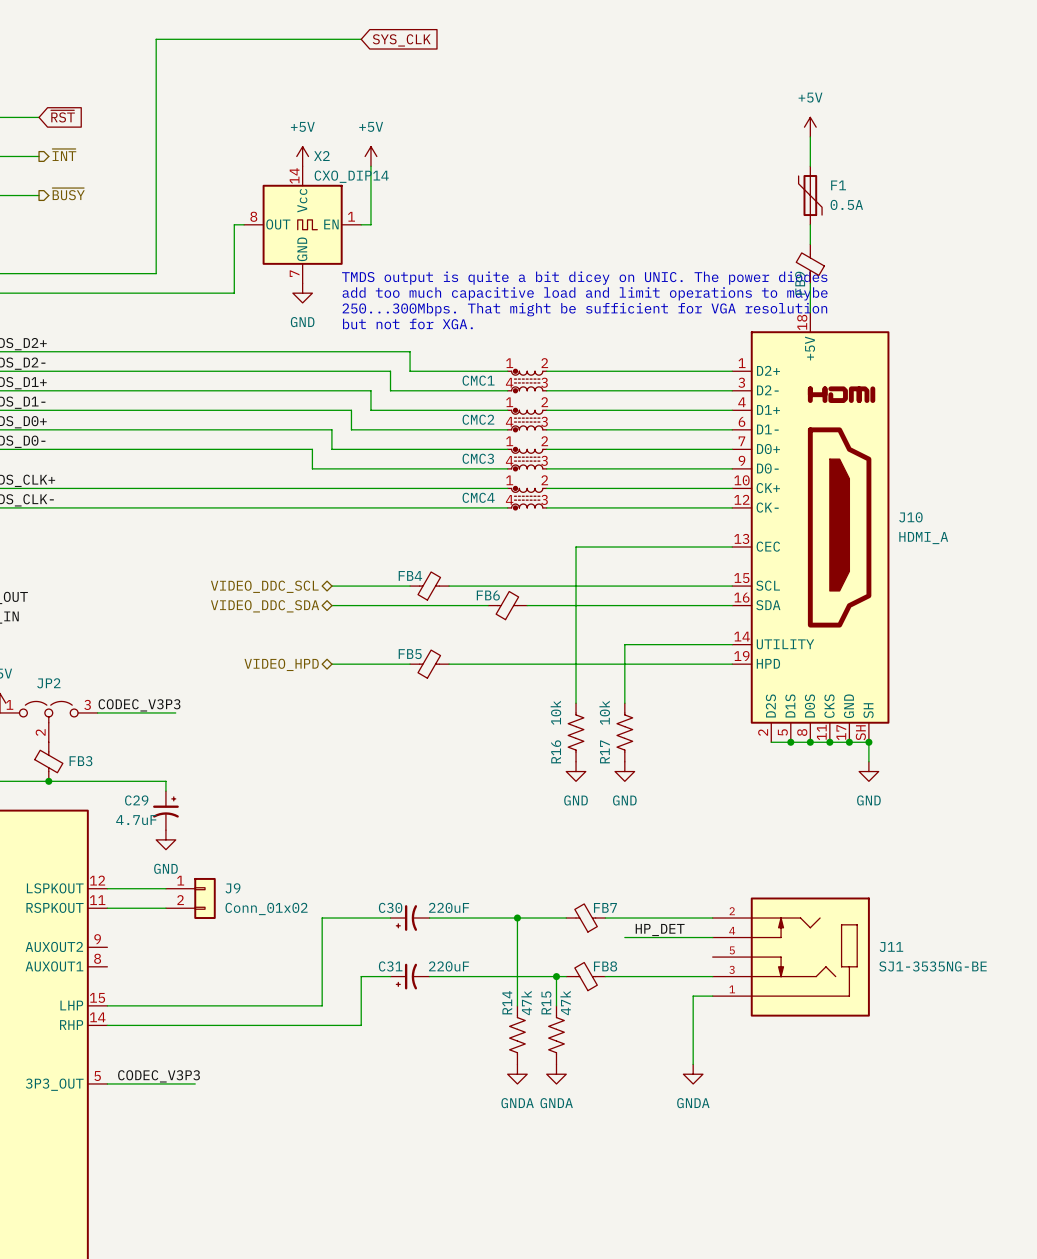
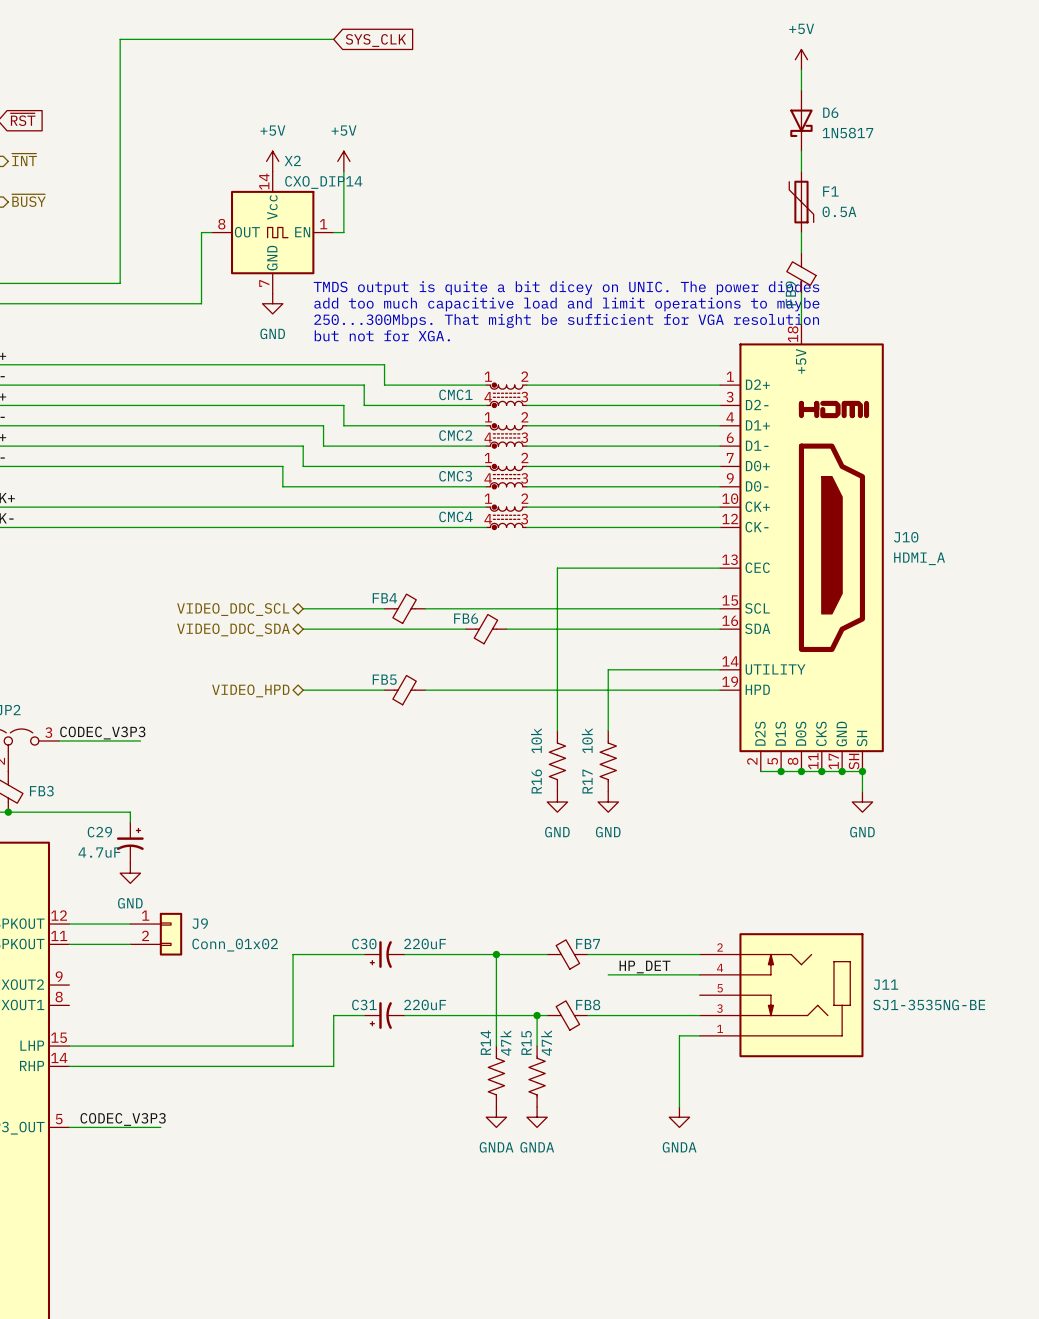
wire: none -> (801, 69) (801, 90)
D6: none -> 1N5817 (801, 120)
power symbol position: +5V (810, 127) -> +5V (801, 59)

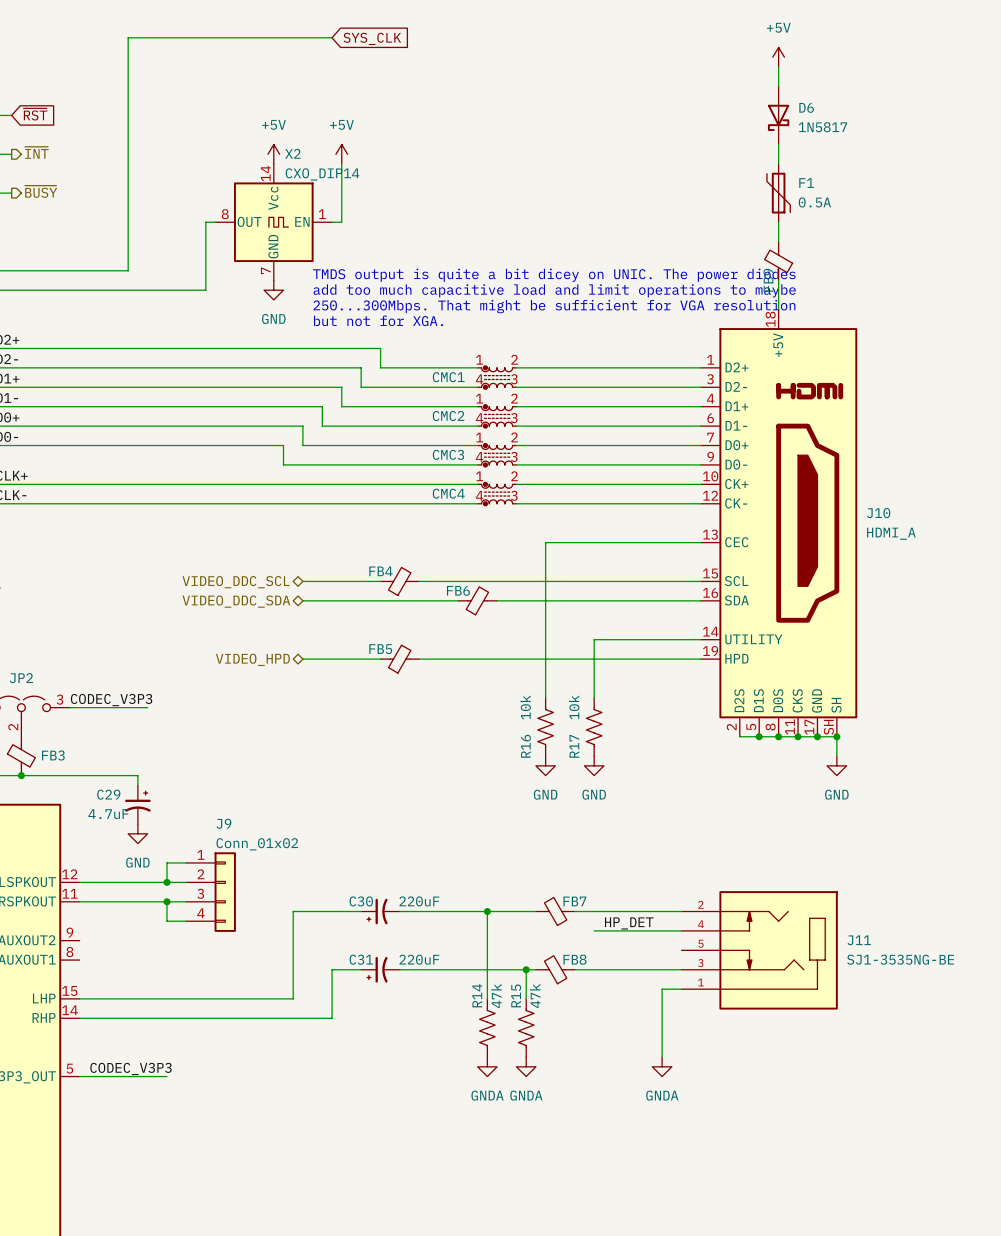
wire: none -> (186, 862) (167, 862) (167, 882)
J9 symbol: [130, 912, 183, 956] -> [186, 852, 236, 932]
J9 name position: J9 (200, 923) -> J9 (223, 823)
junction: none -> (167, 882)
wire: none -> (167, 901) (167, 921) (186, 921)
junction: none -> (167, 901)
J9 value position: Conn_01x02 (235, 945) -> Conn_01x02 (257, 844)

